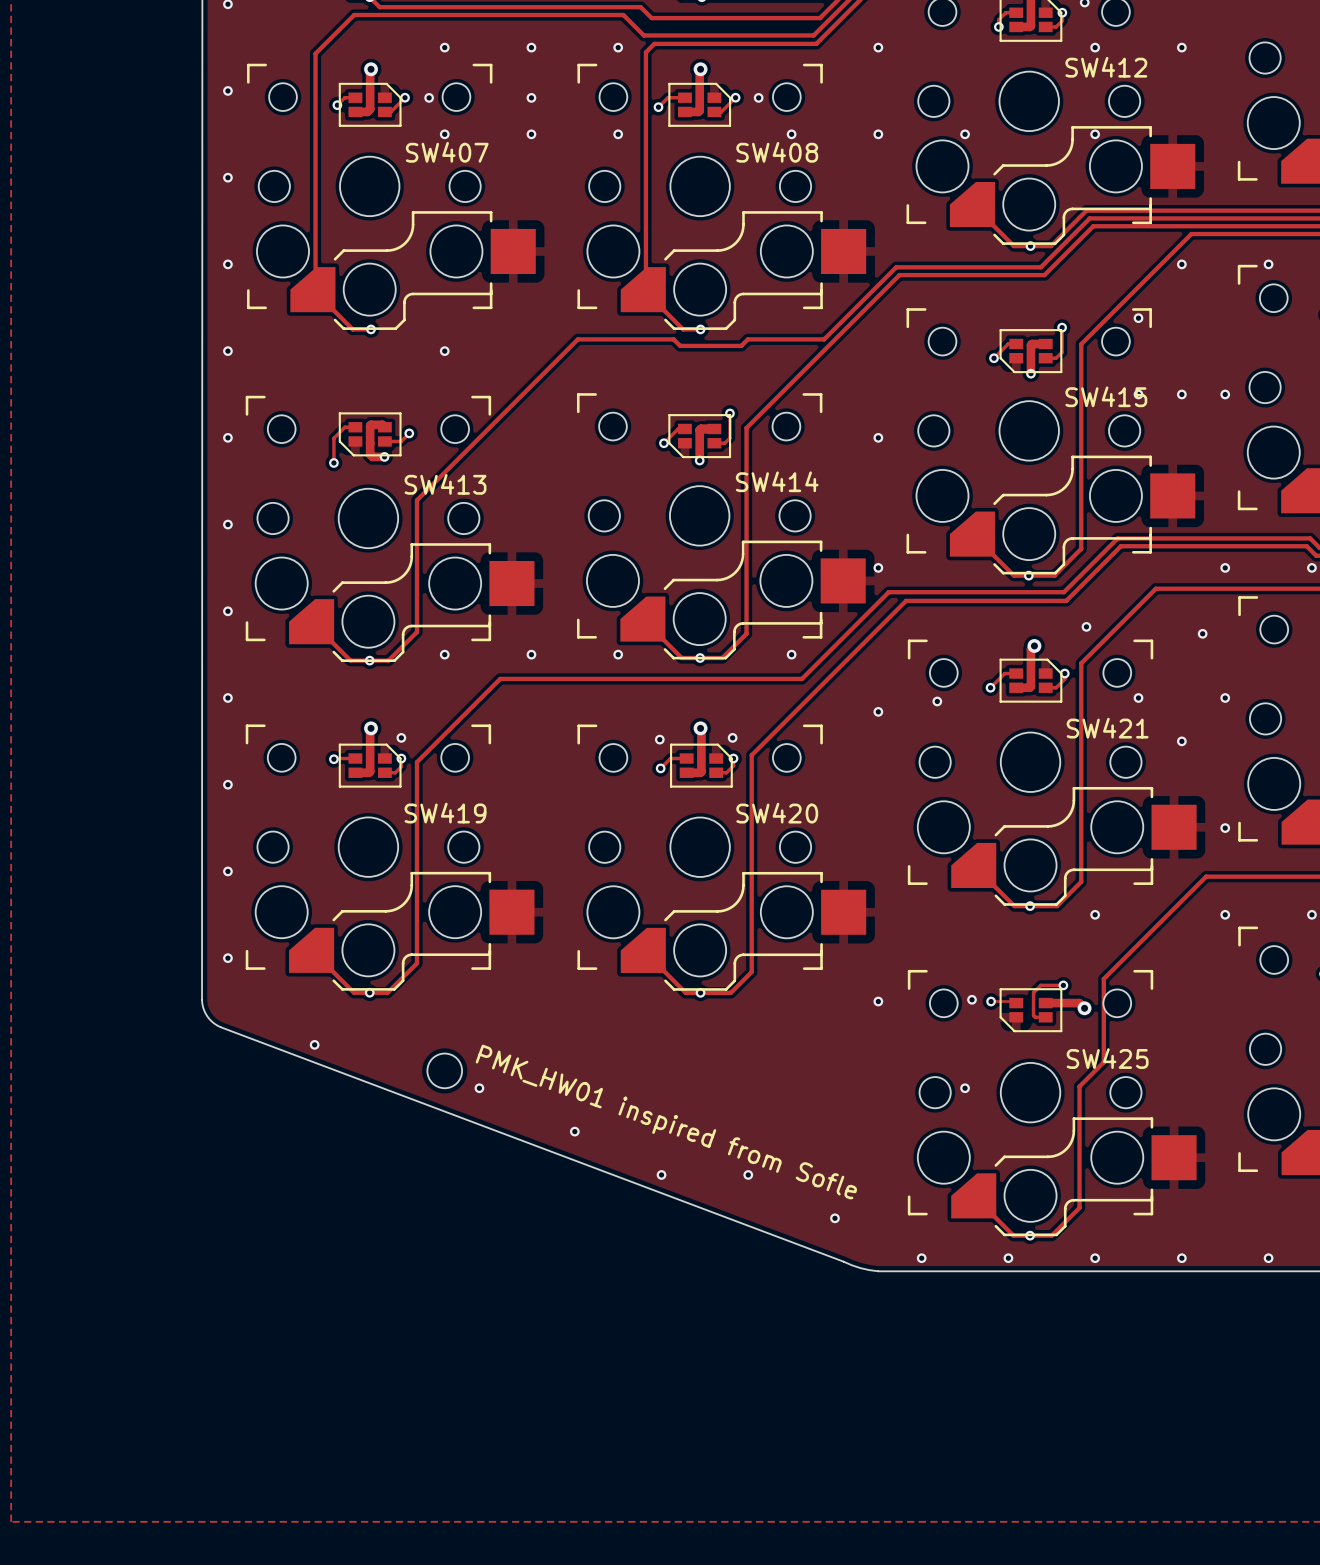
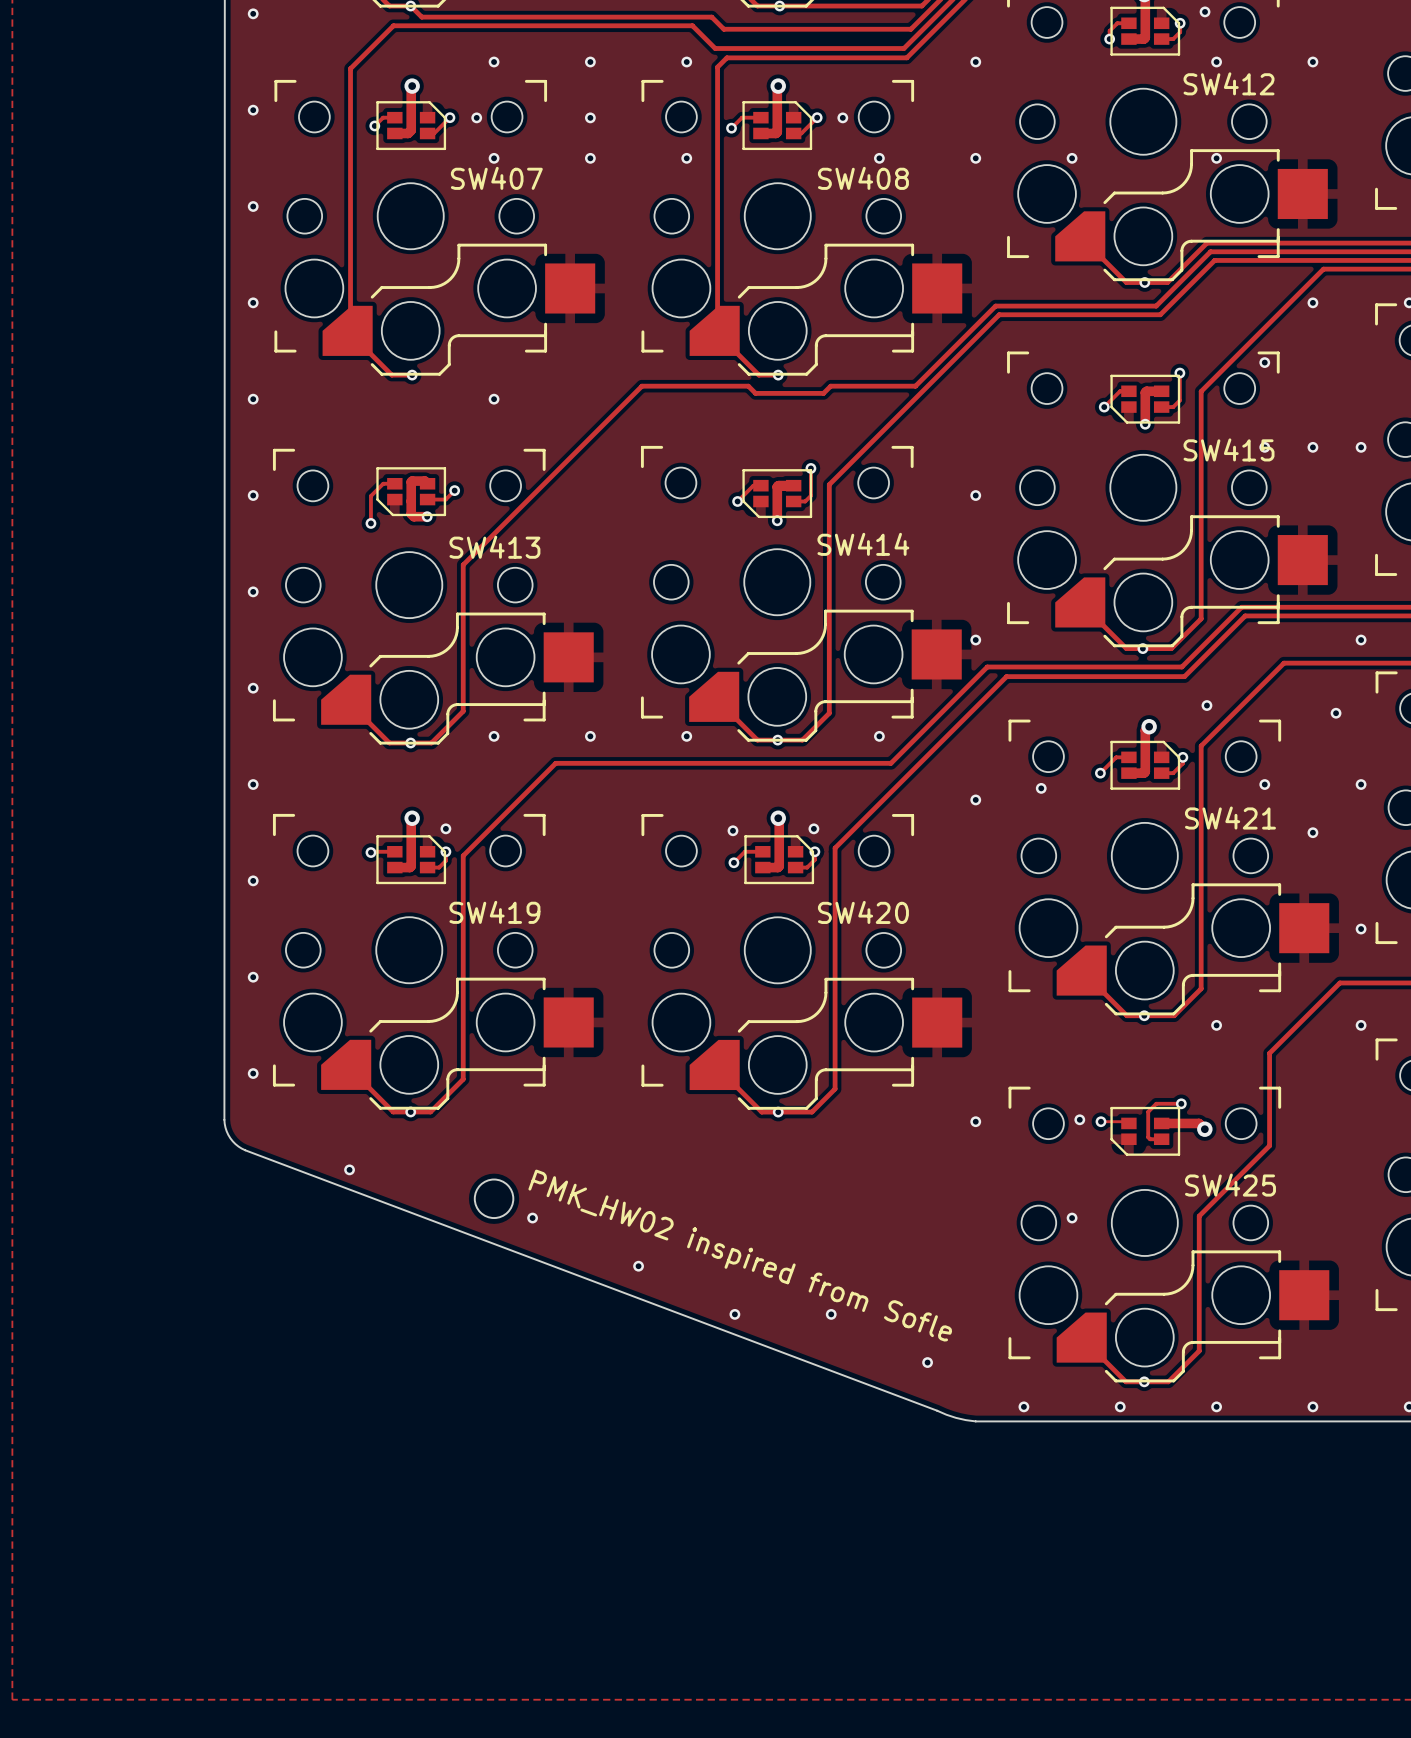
track: (1142, 939) (1103, 978) (1103, 1062) -> (1269, 1053) (1269, 1145) (1226, 1189)
text: PMK_HW01 inspired from Sofle (666, 1122) -> PMK_HW02 inspired from Sofle (740, 1255)

